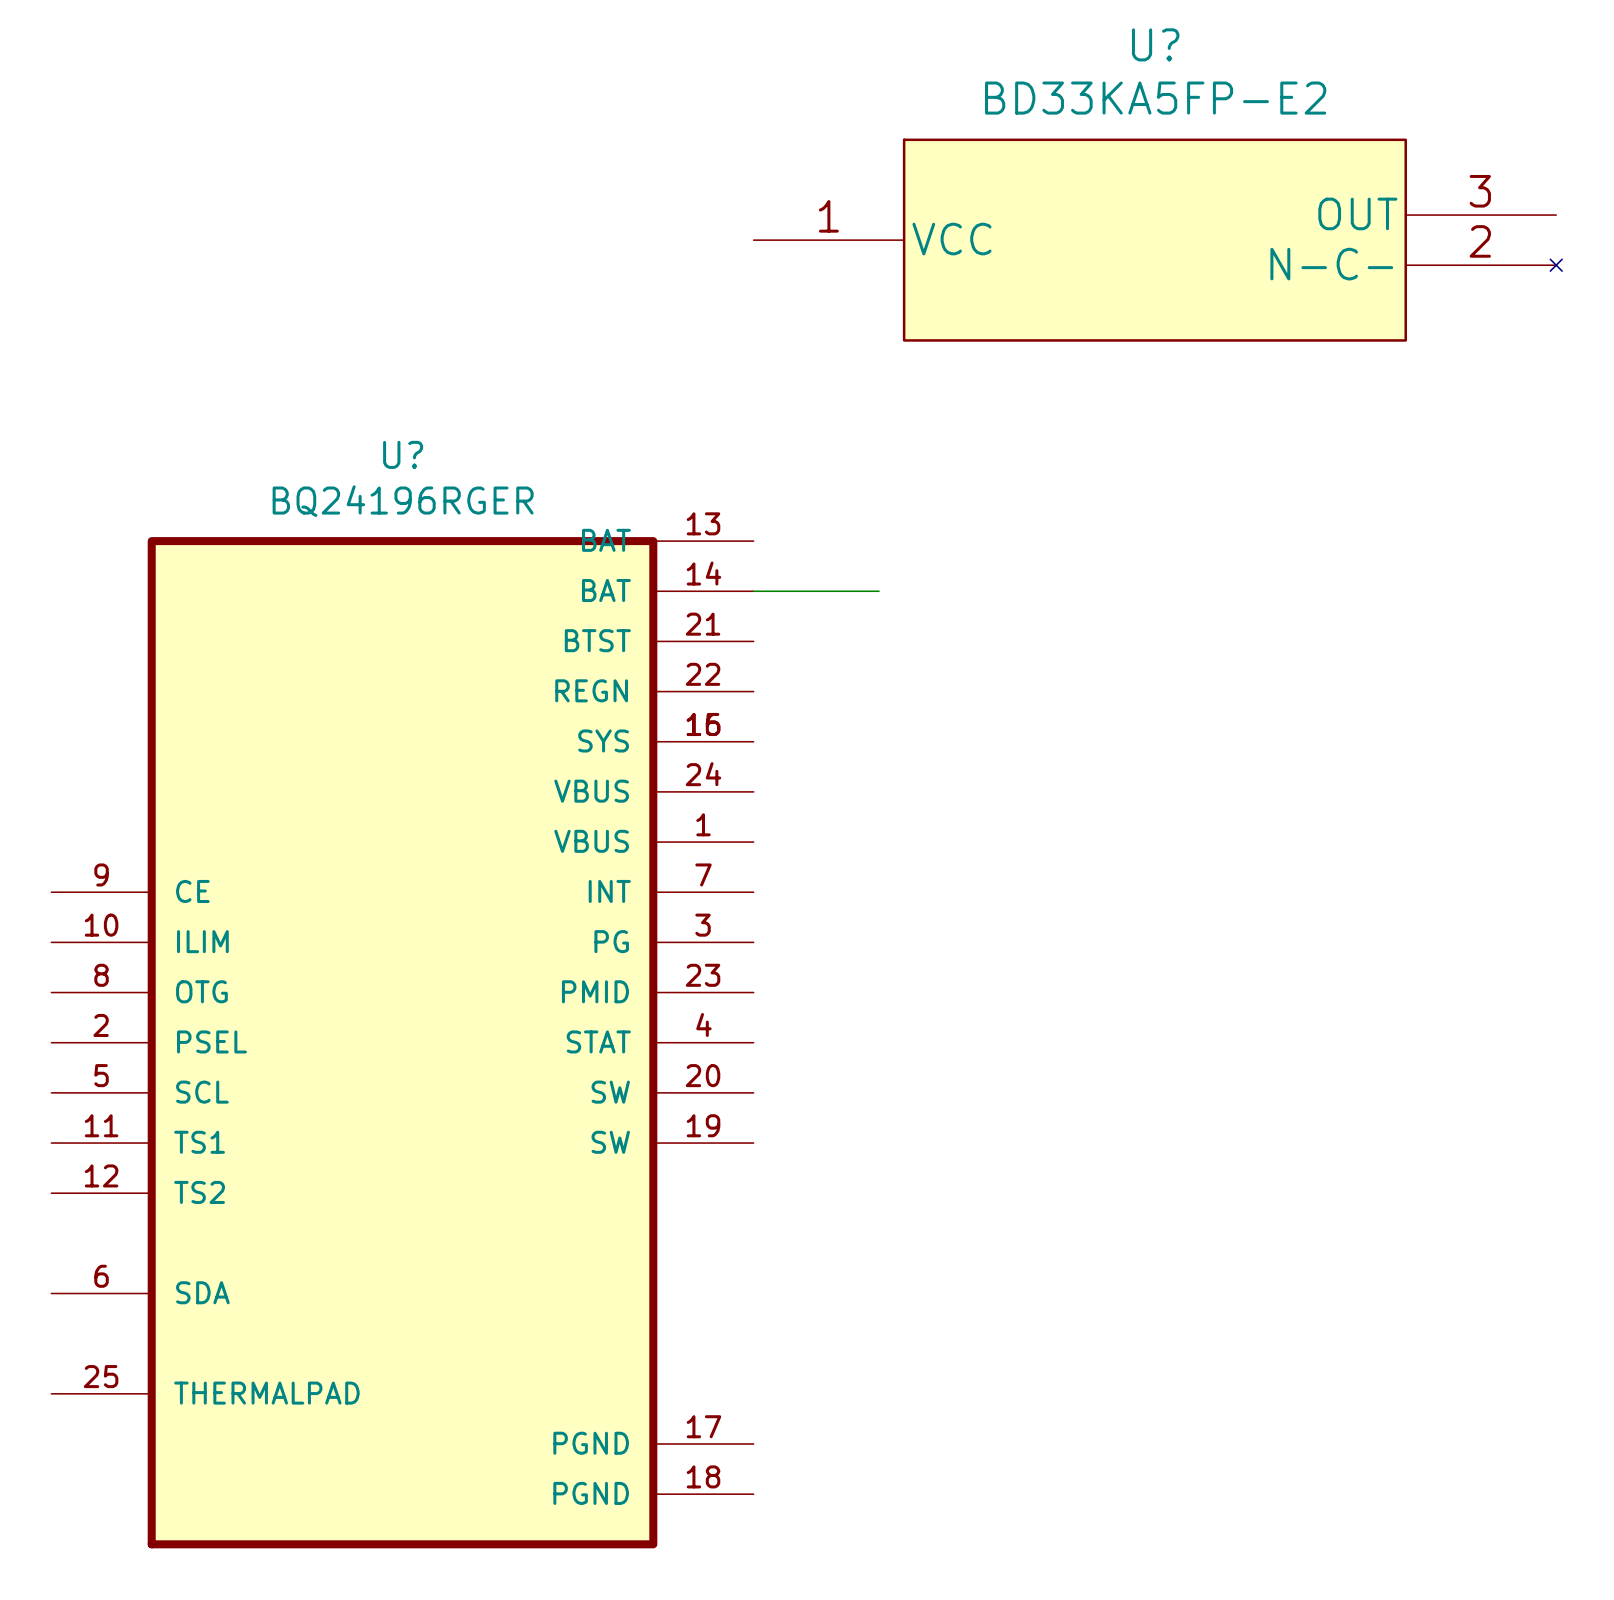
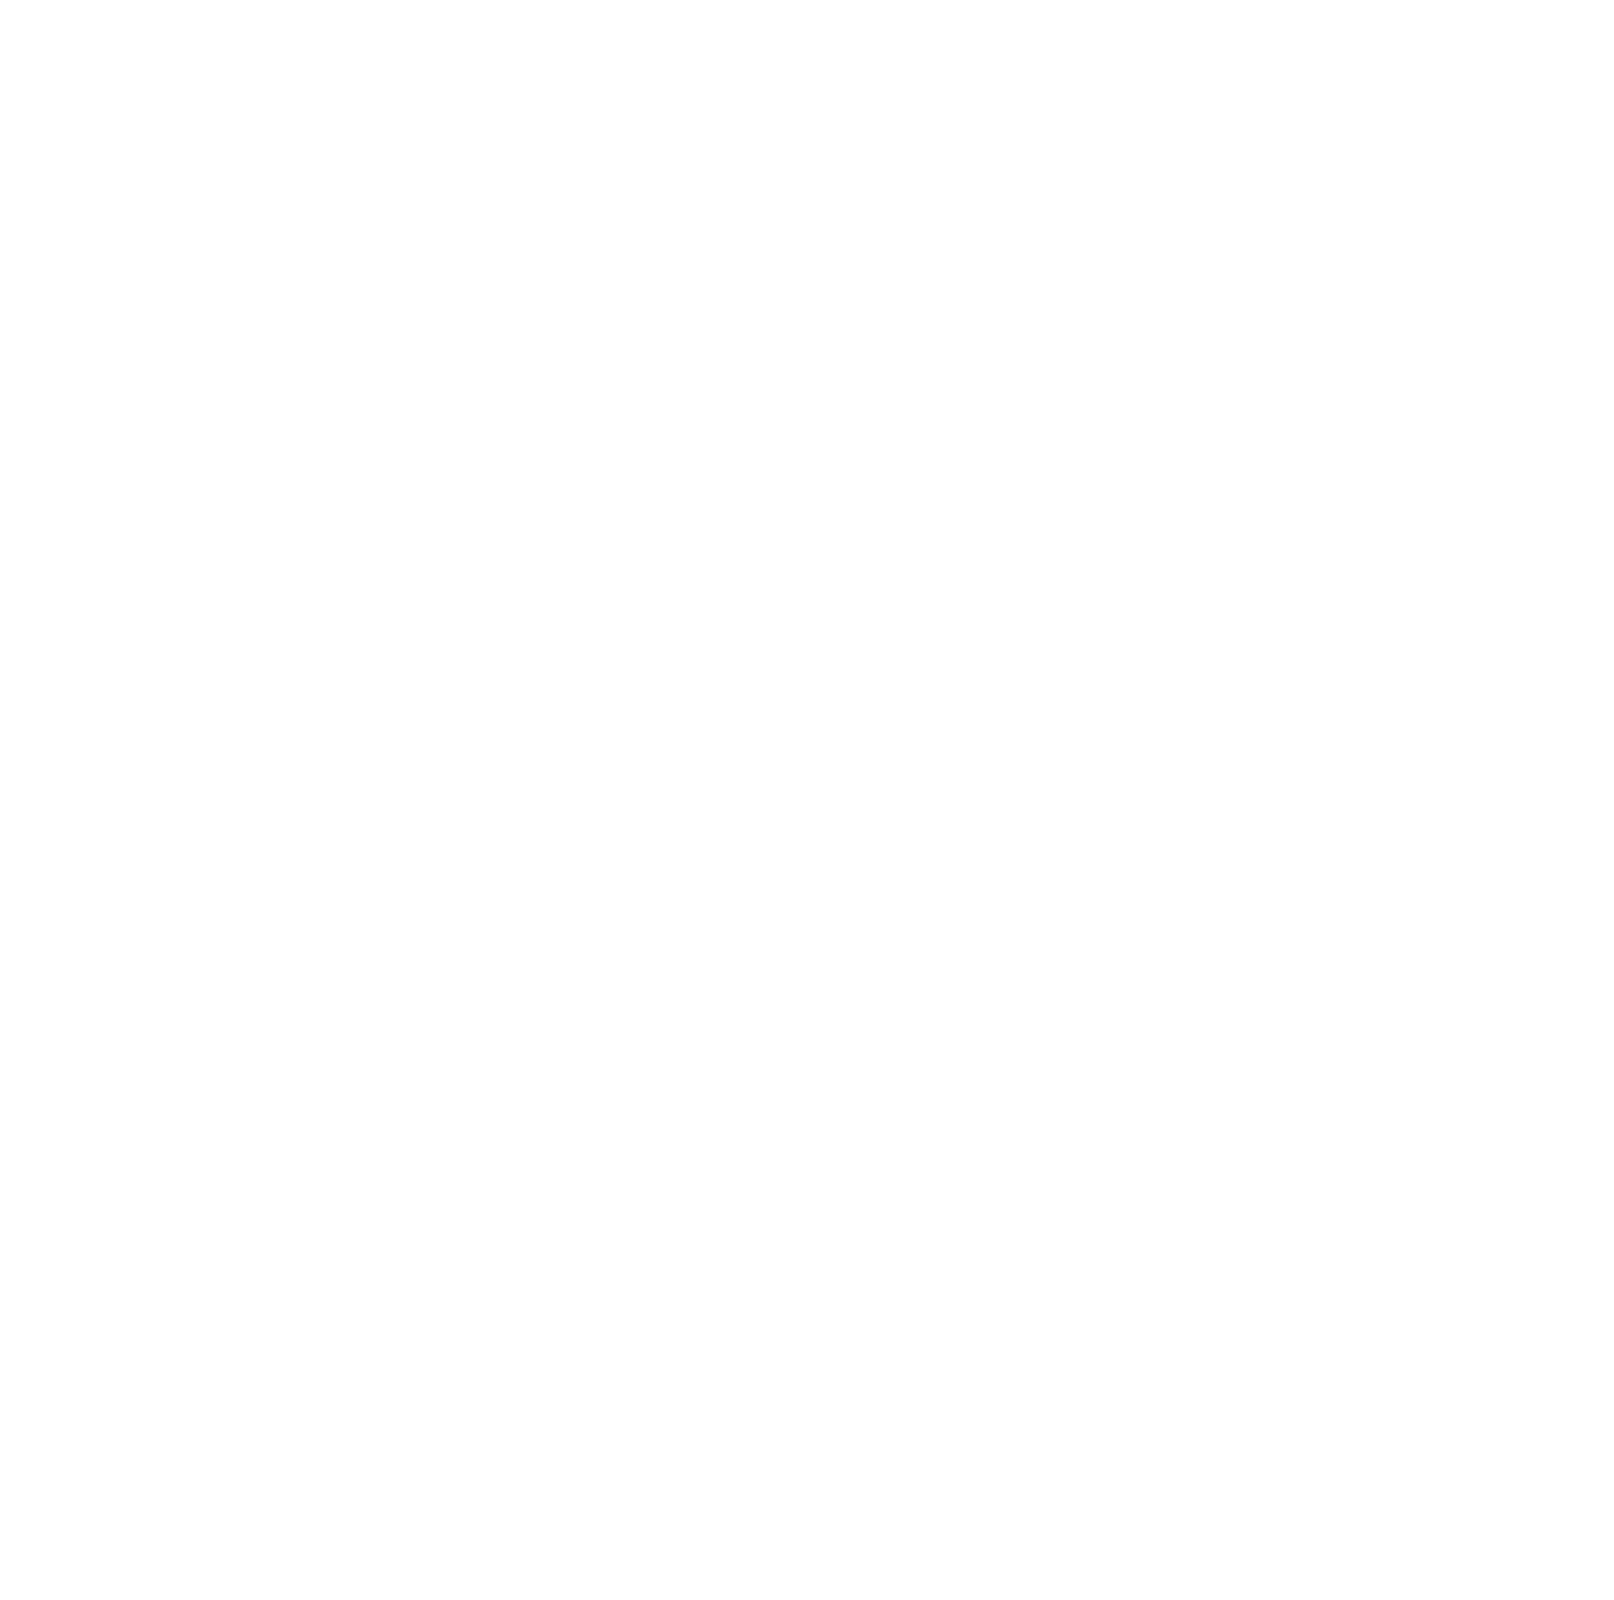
U?: BD33KA5FP-E2 (1157, 240) -> none
wire: (753, 591) (879, 591) -> none
U?: BQ24196RGER (402, 1042) -> none

